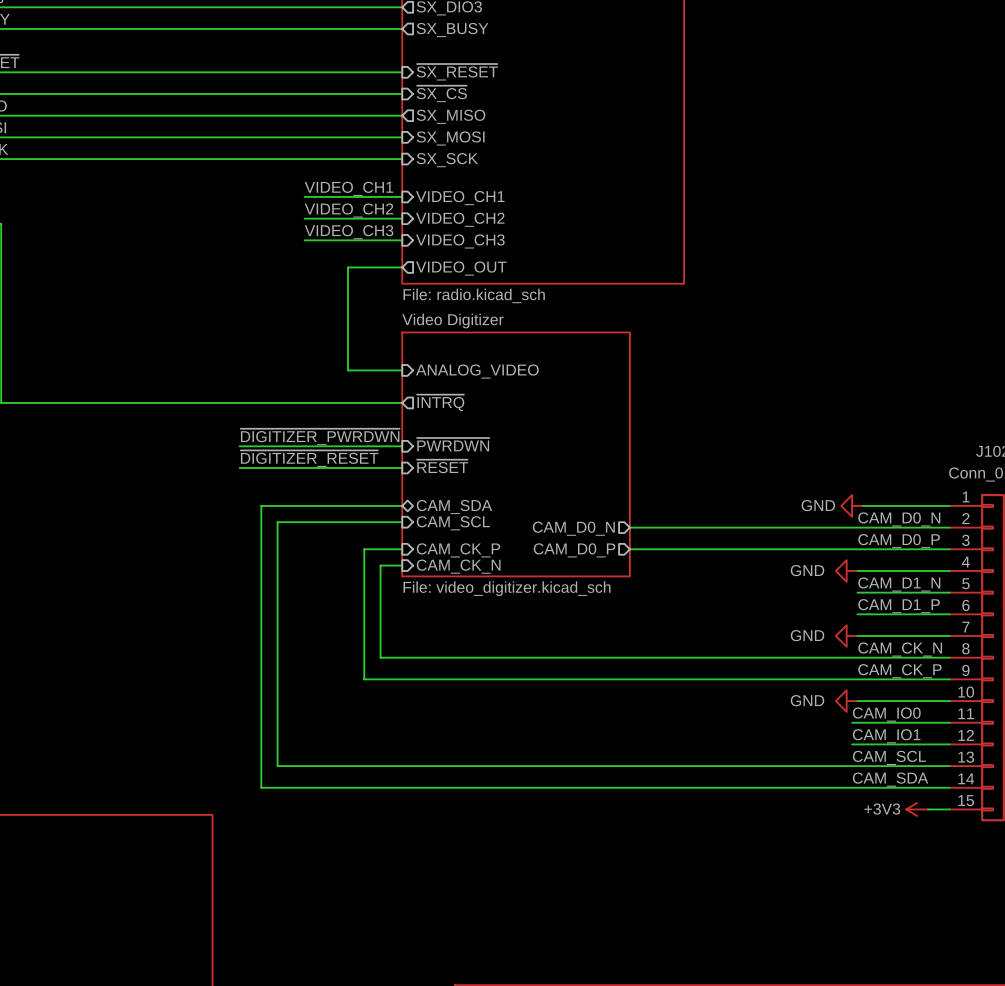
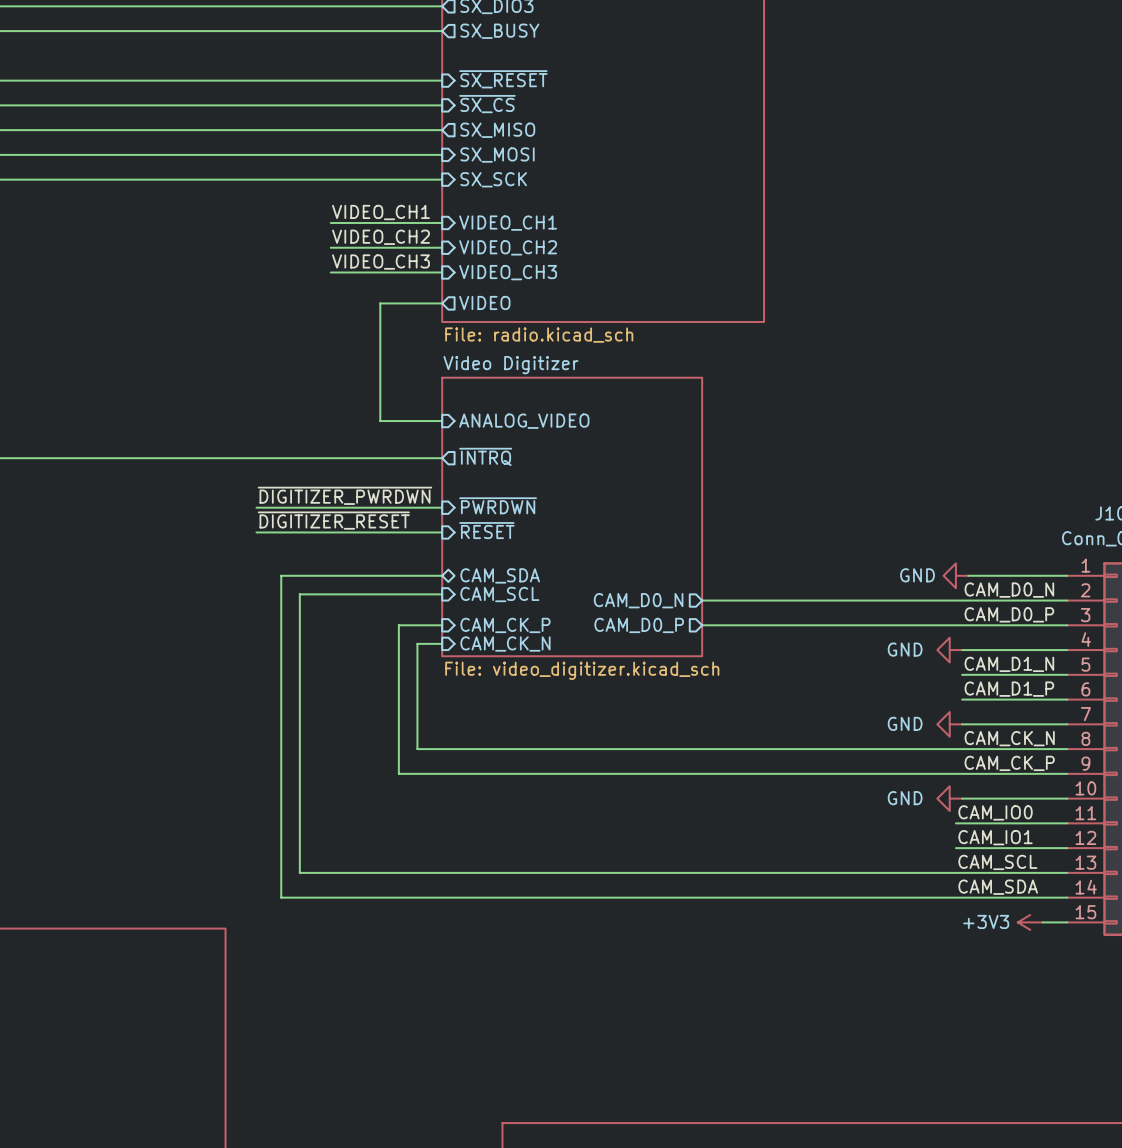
sheet pin: VIDEO_OUT (461, 268) -> VIDEO (484, 302)

